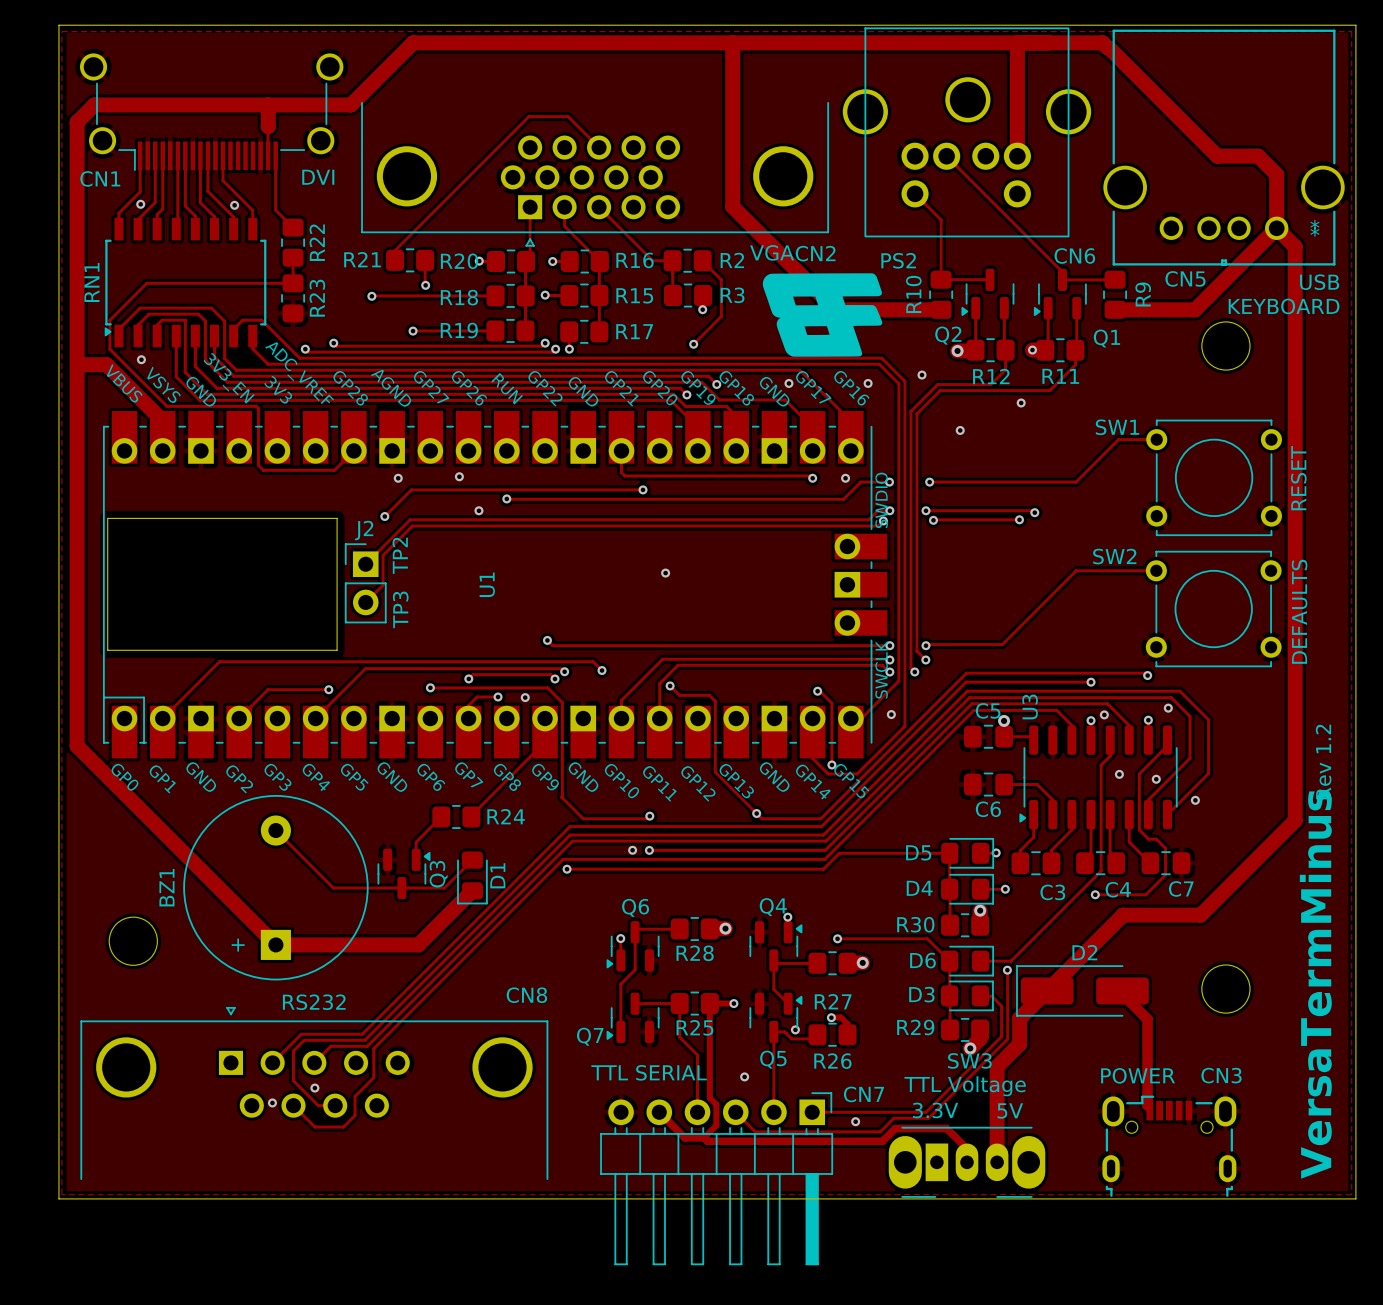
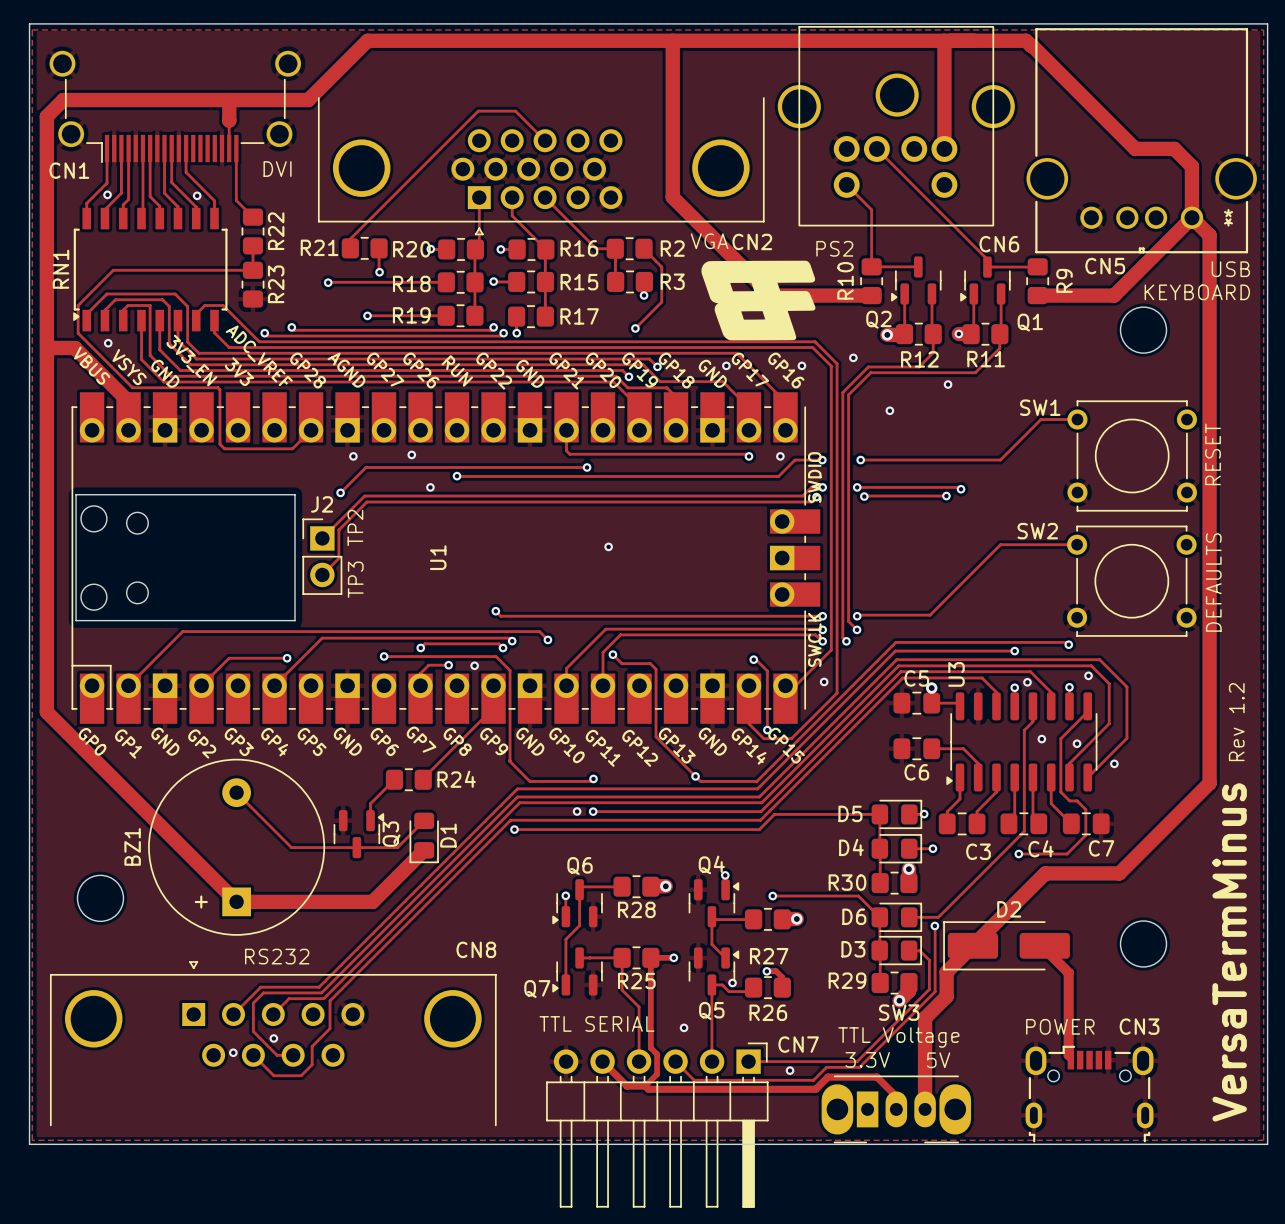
U1 footprint: [102, 411, 888, 759] -> [71, 392, 821, 724]

